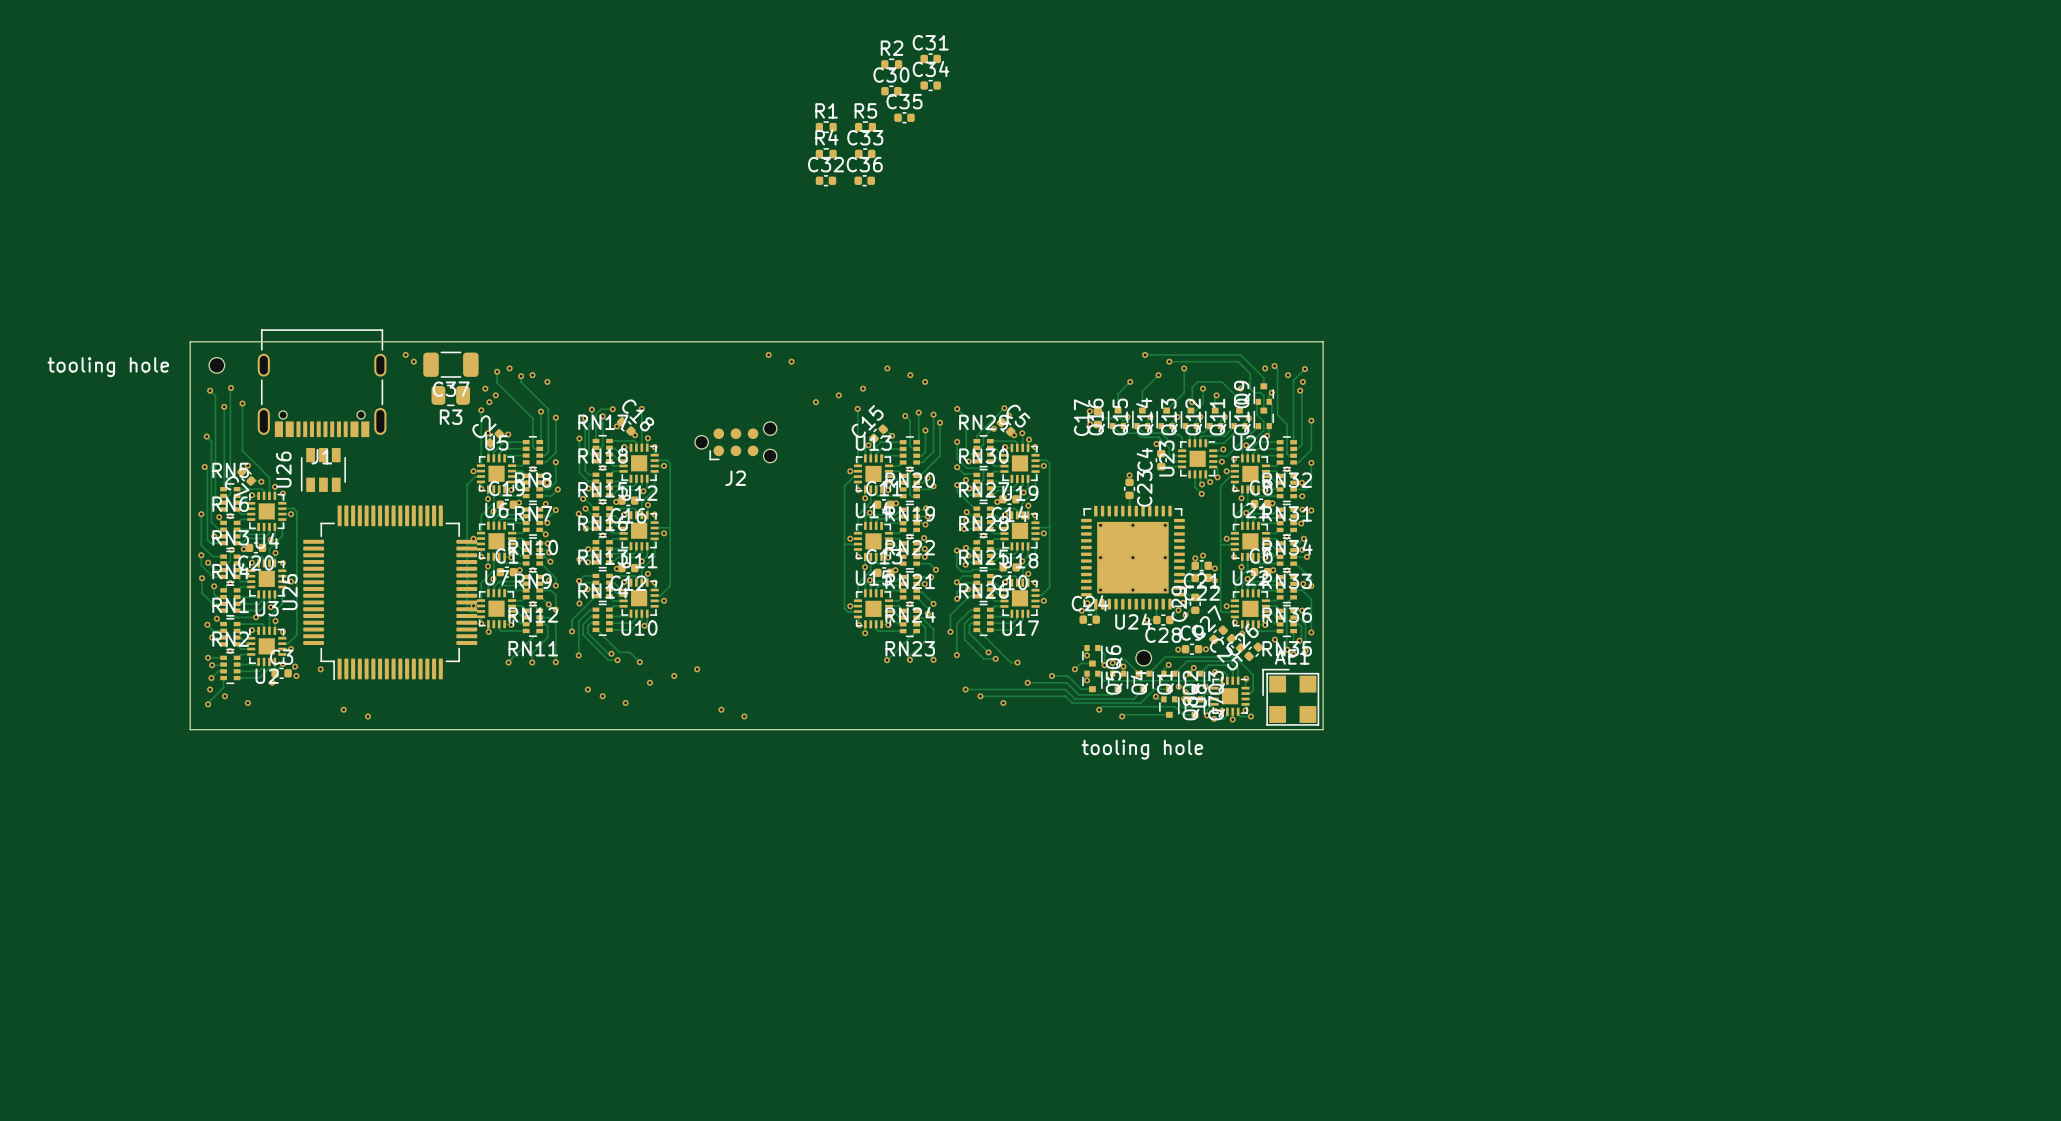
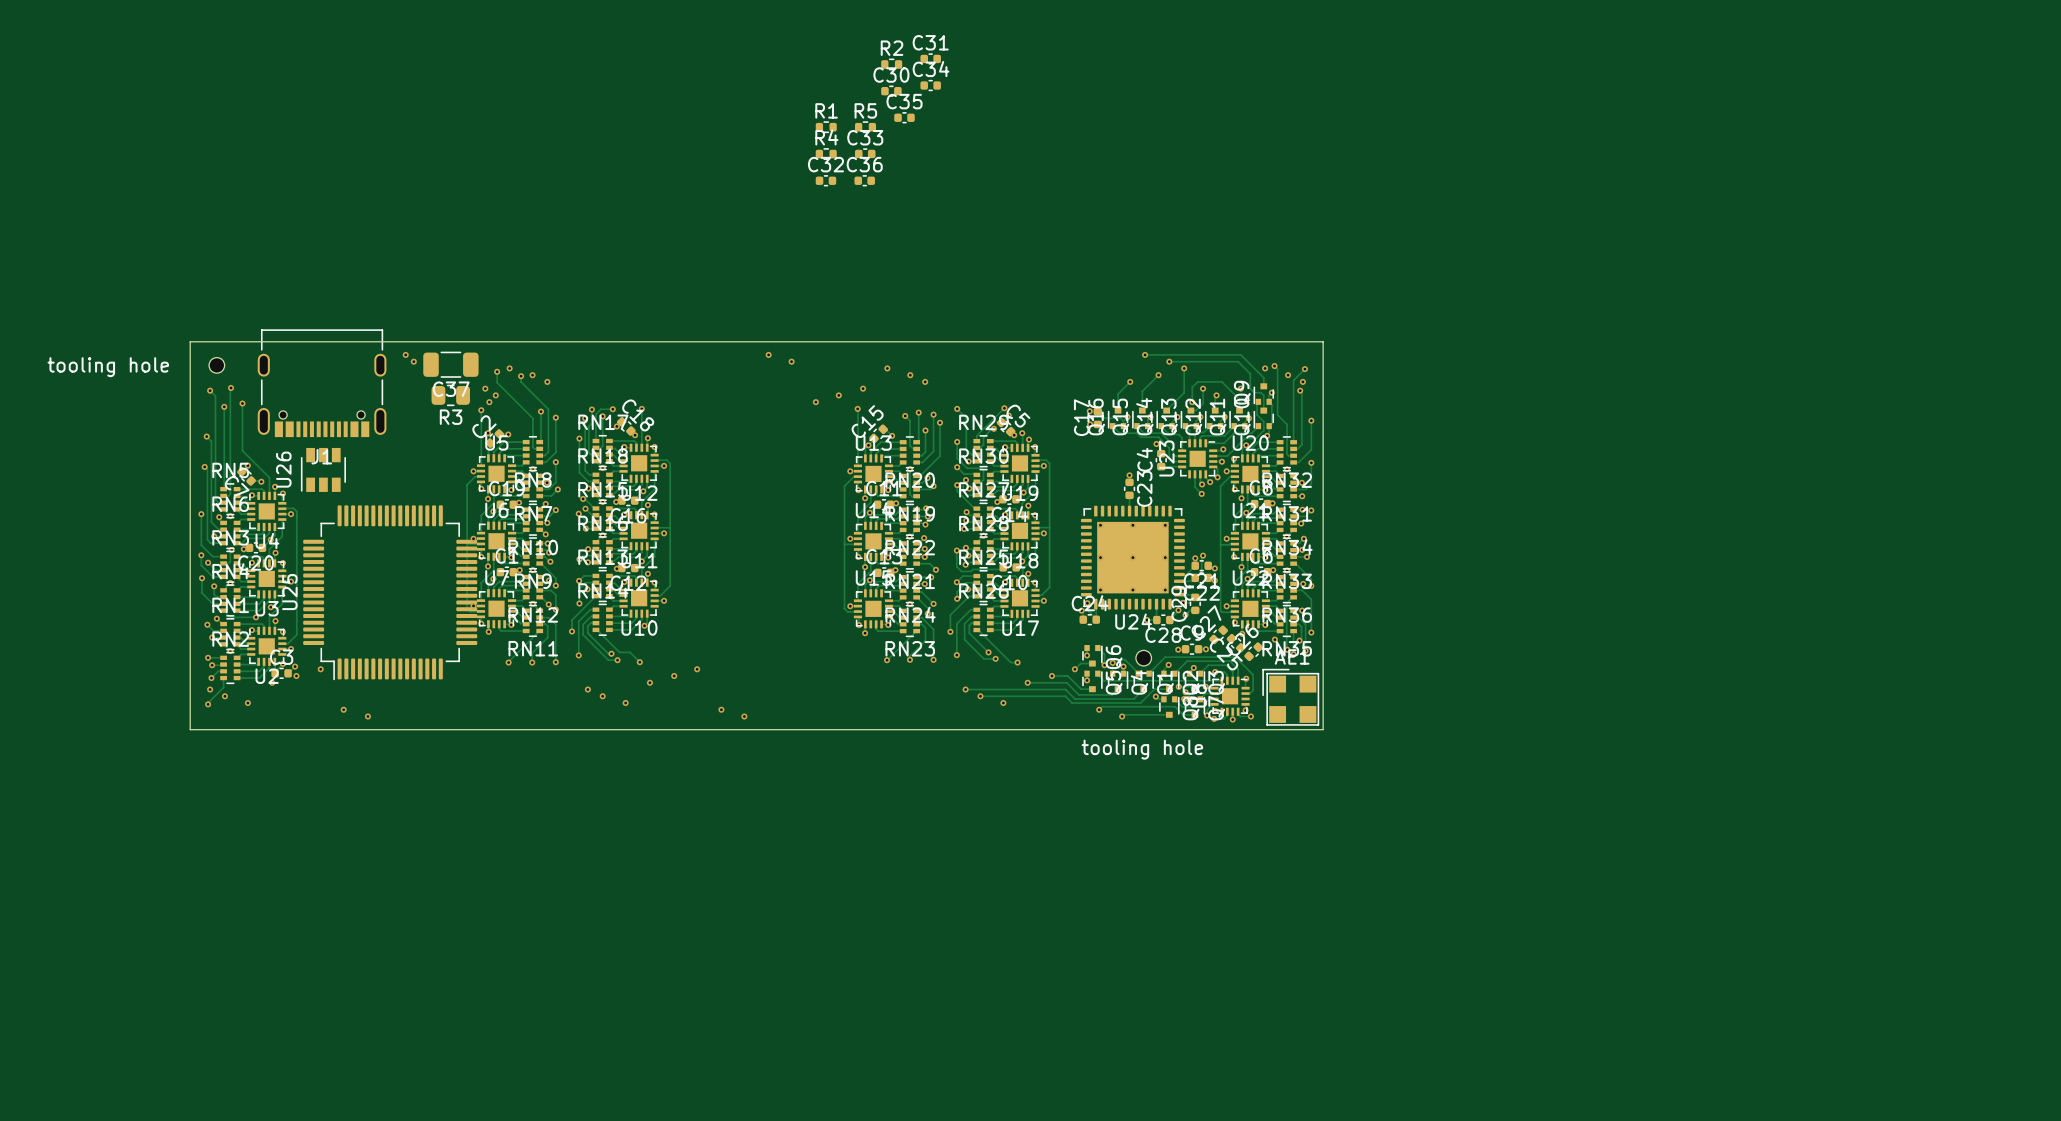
J2: (735, 442) -> none

